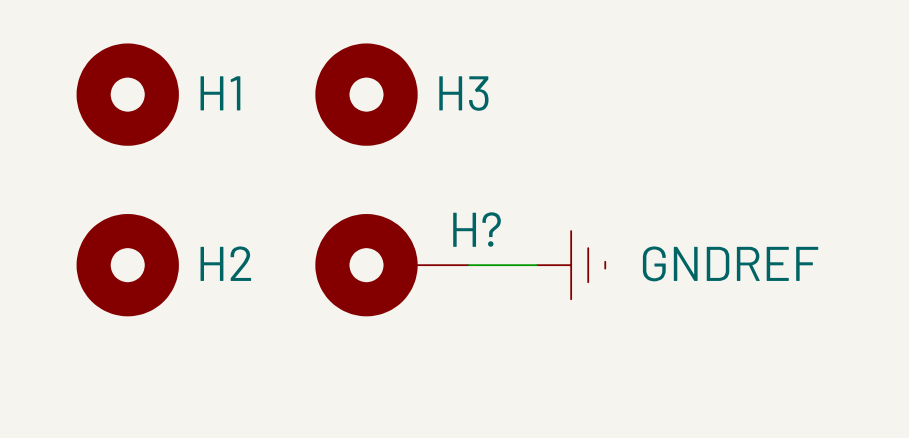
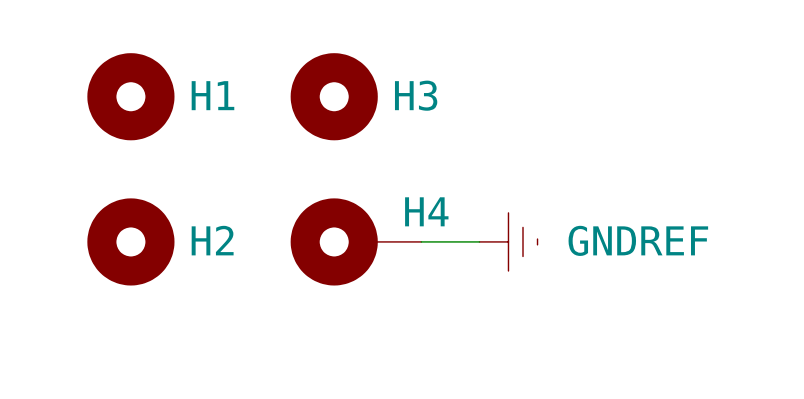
H? name: H? (477, 229) -> H4 (426, 211)

